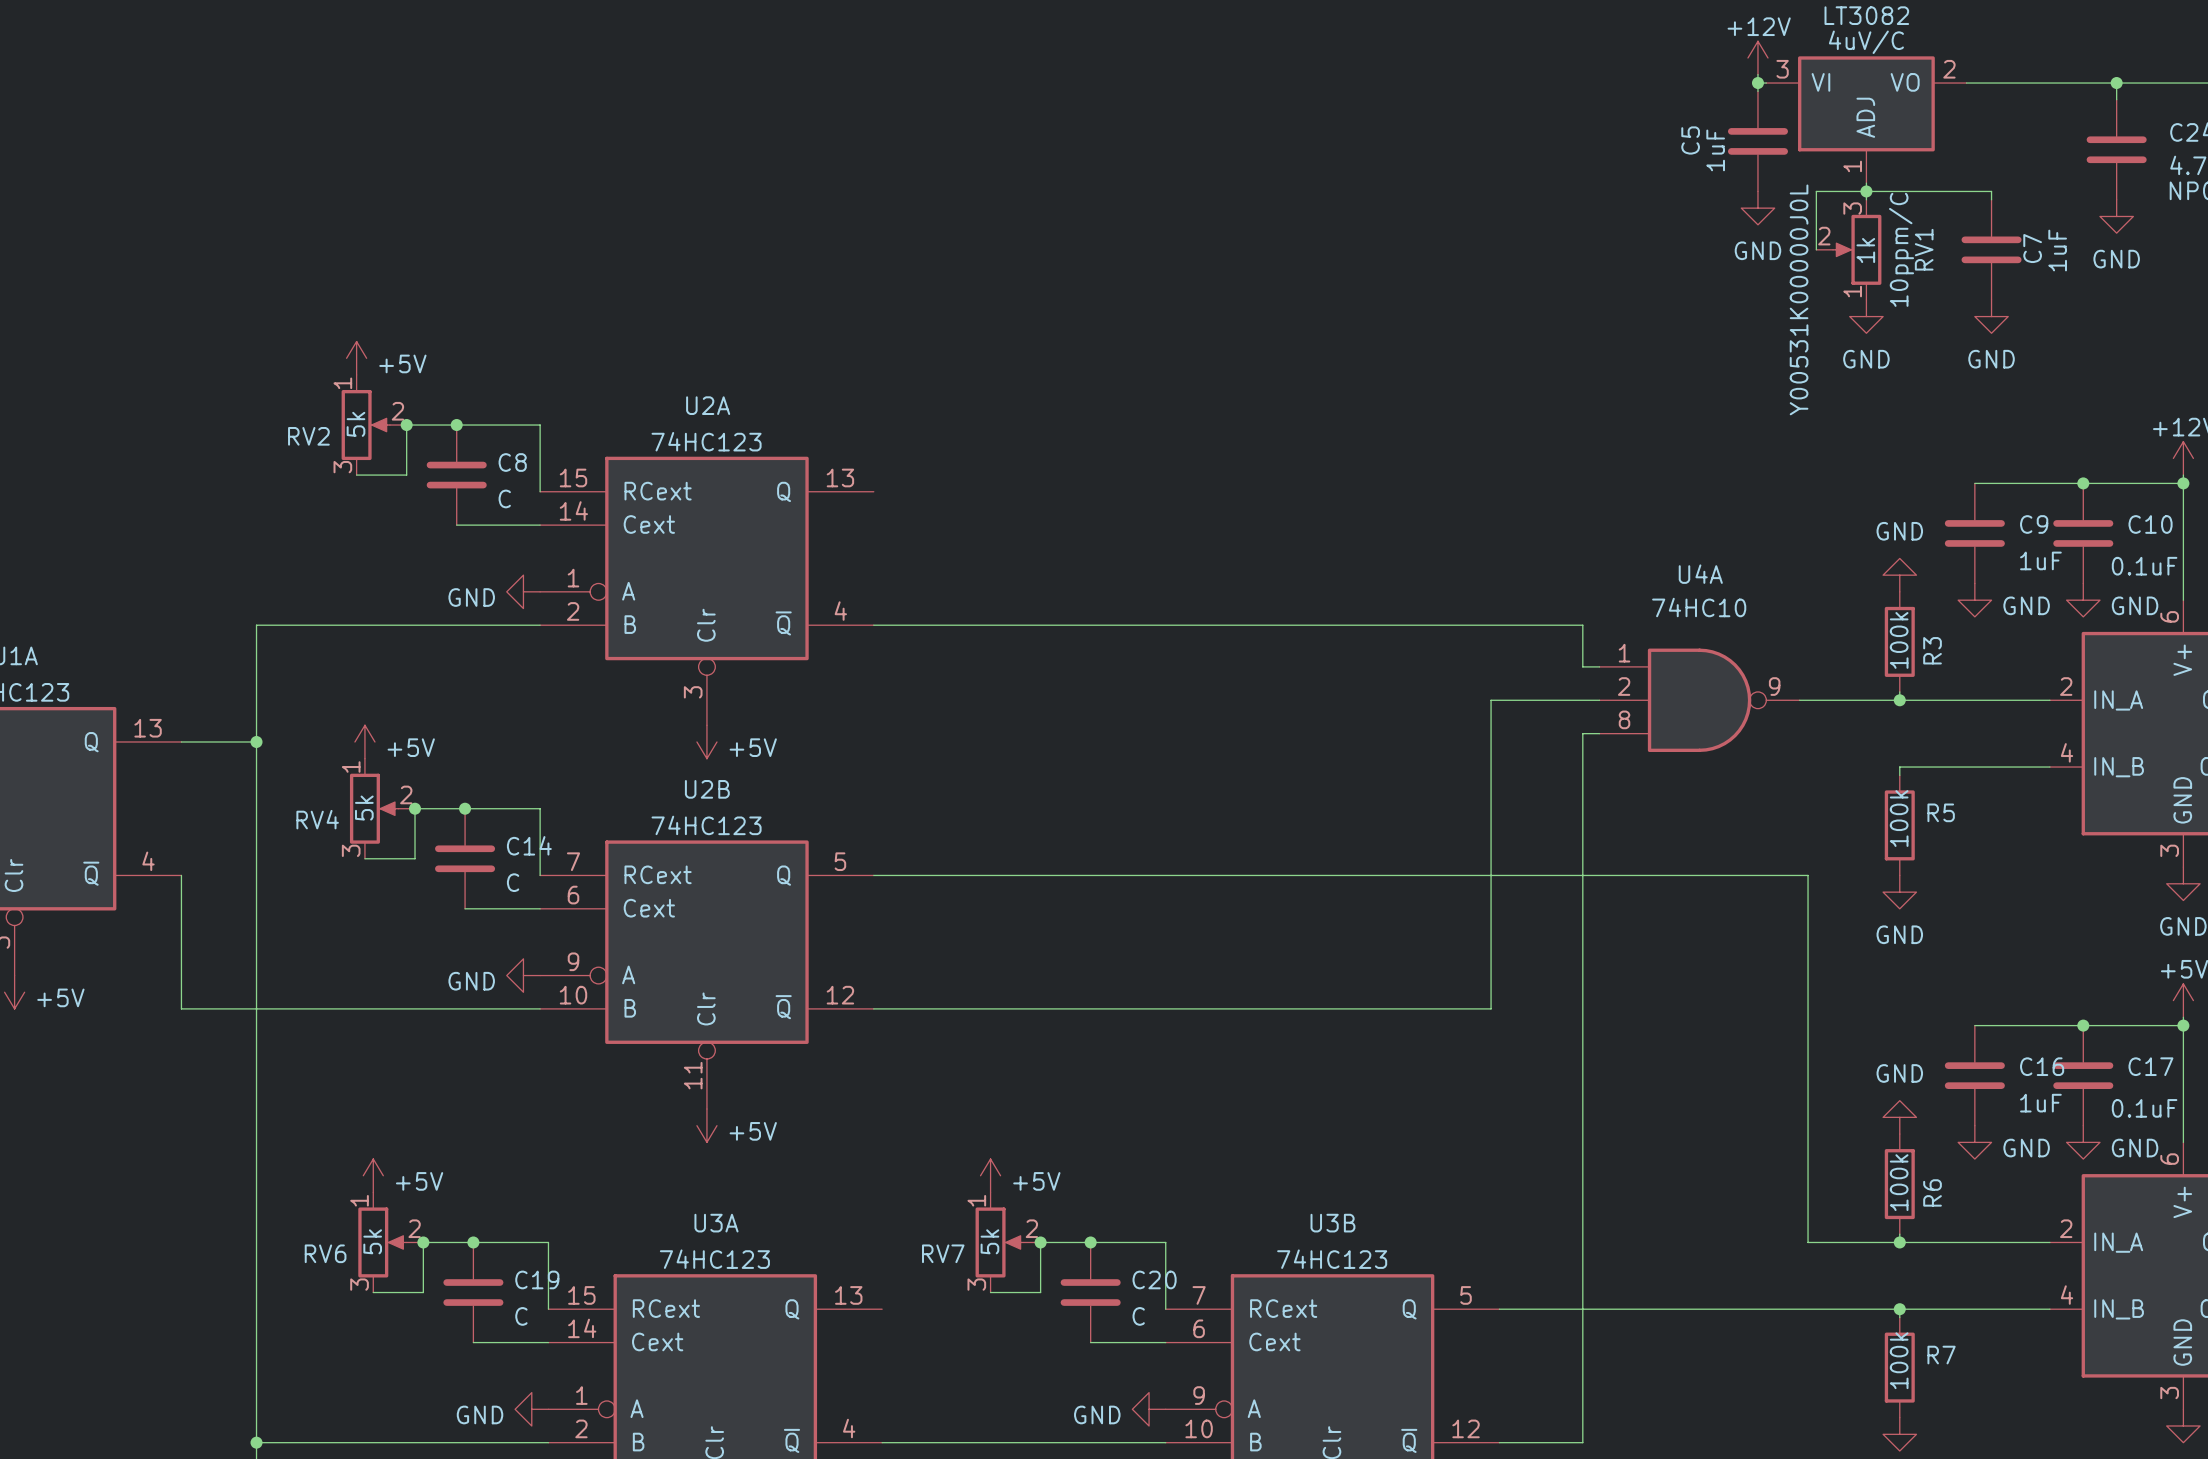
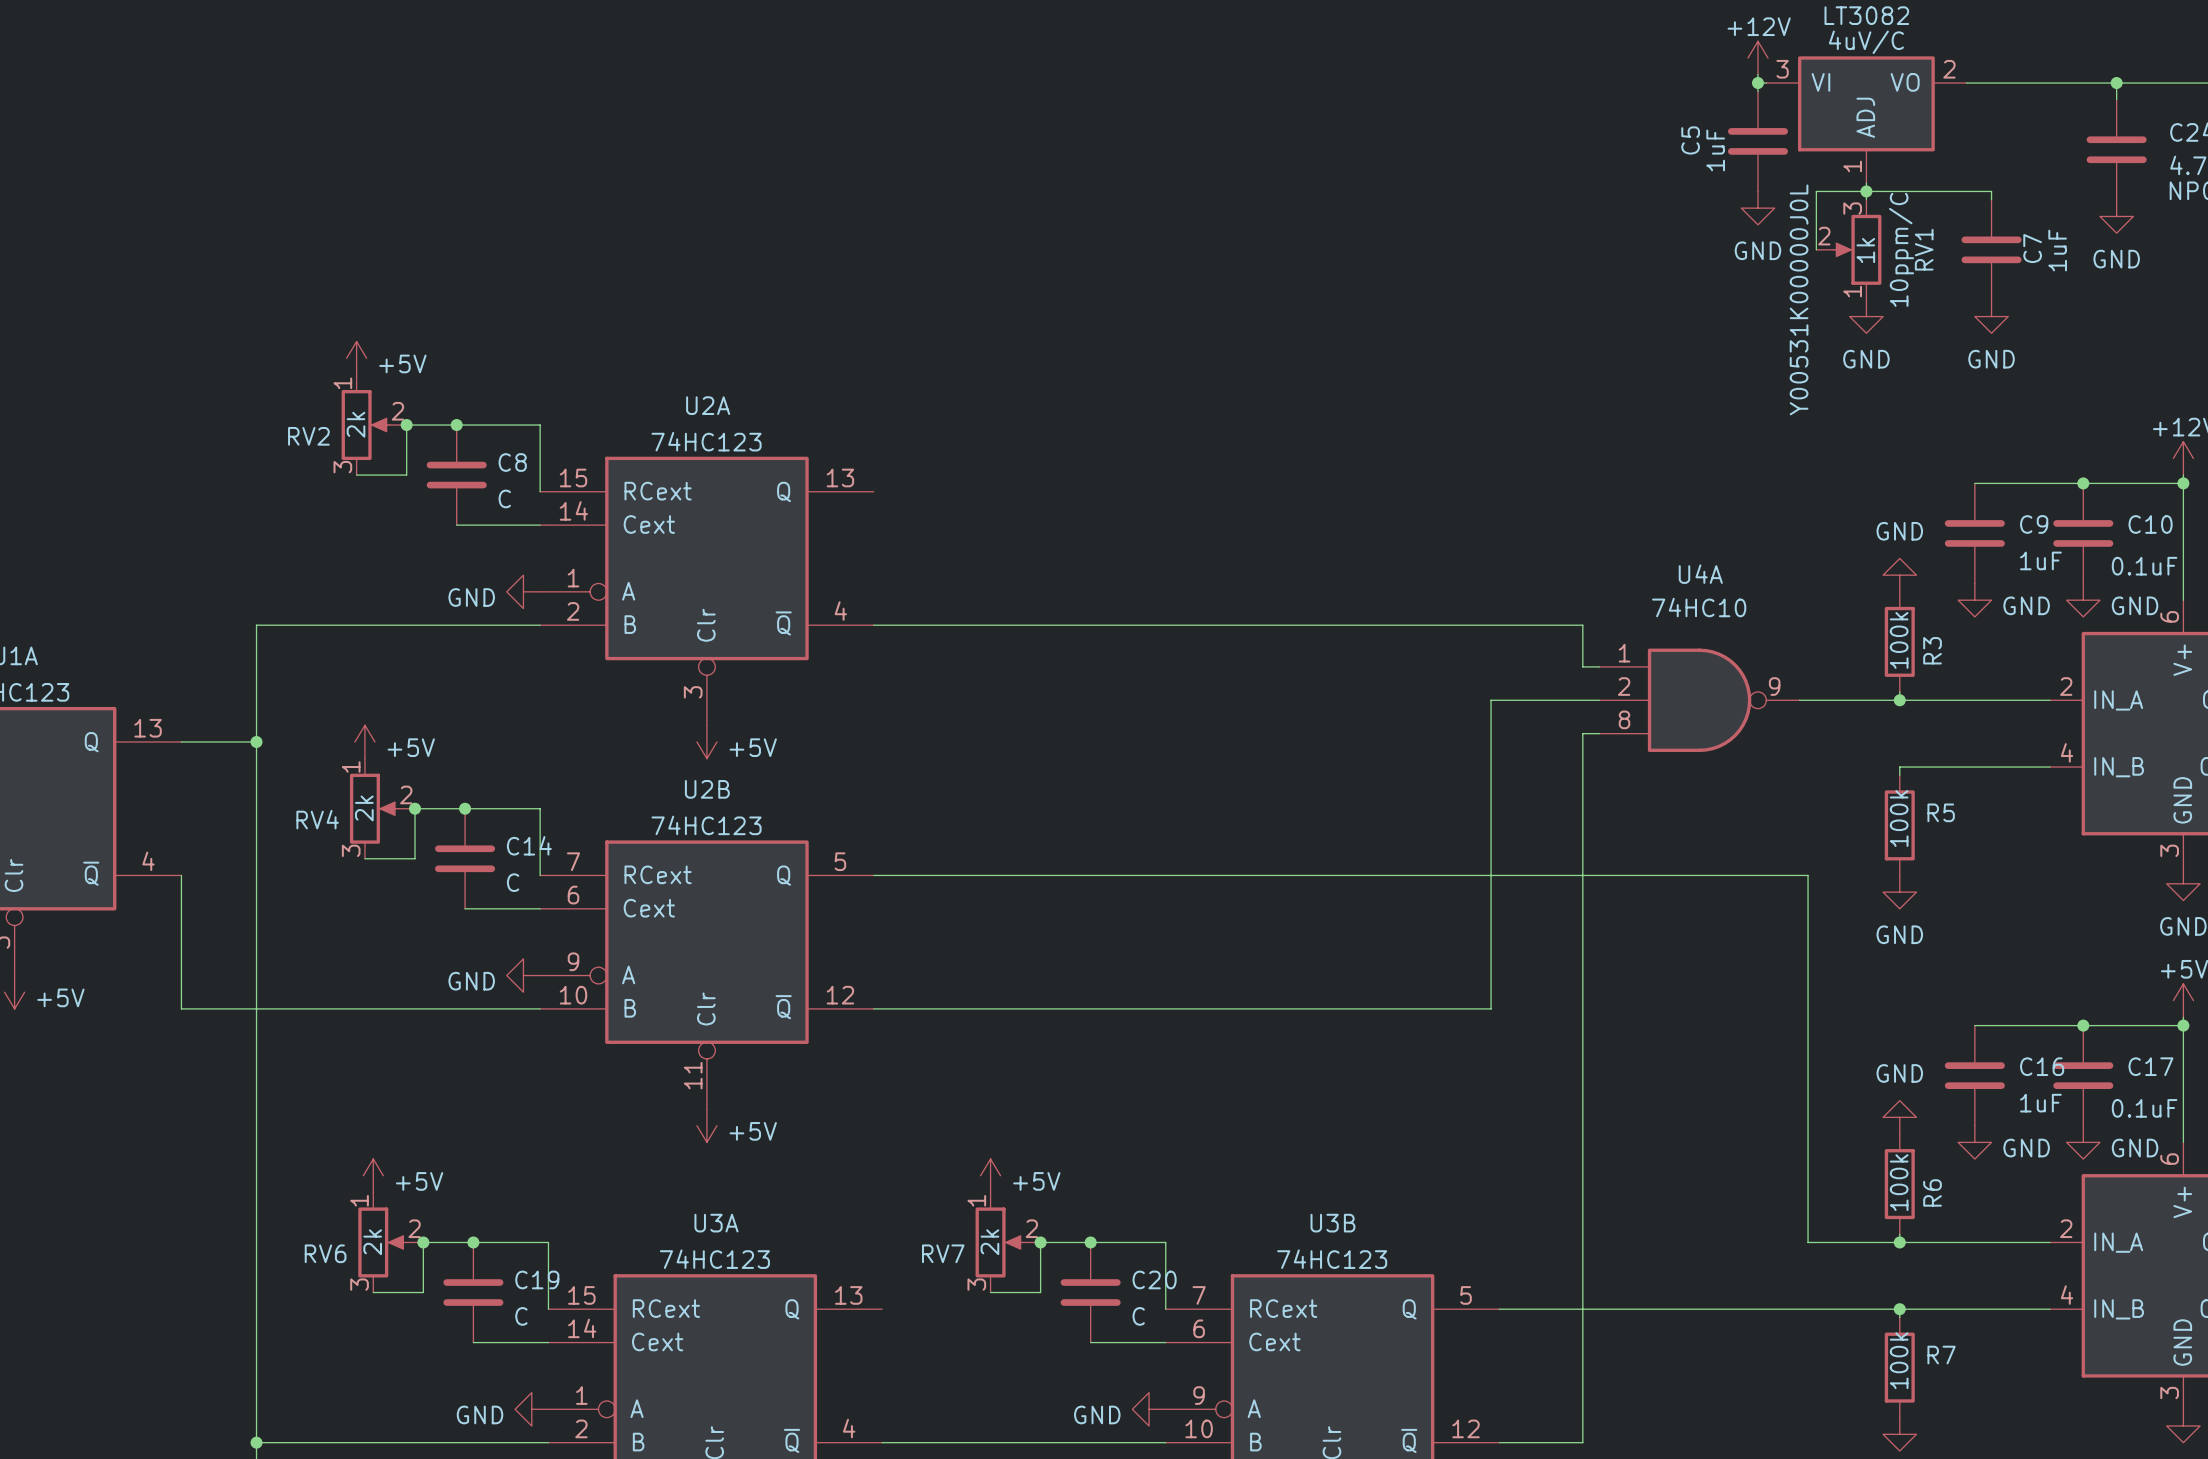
RV2 value: 5k (355, 424) -> 2k (355, 424)
RV4 value: 5k (364, 808) -> 2k (364, 808)
RV6 value: 5k (372, 1241) -> 2k (372, 1242)
RV7 value: 5k (989, 1241) -> 2k (989, 1242)

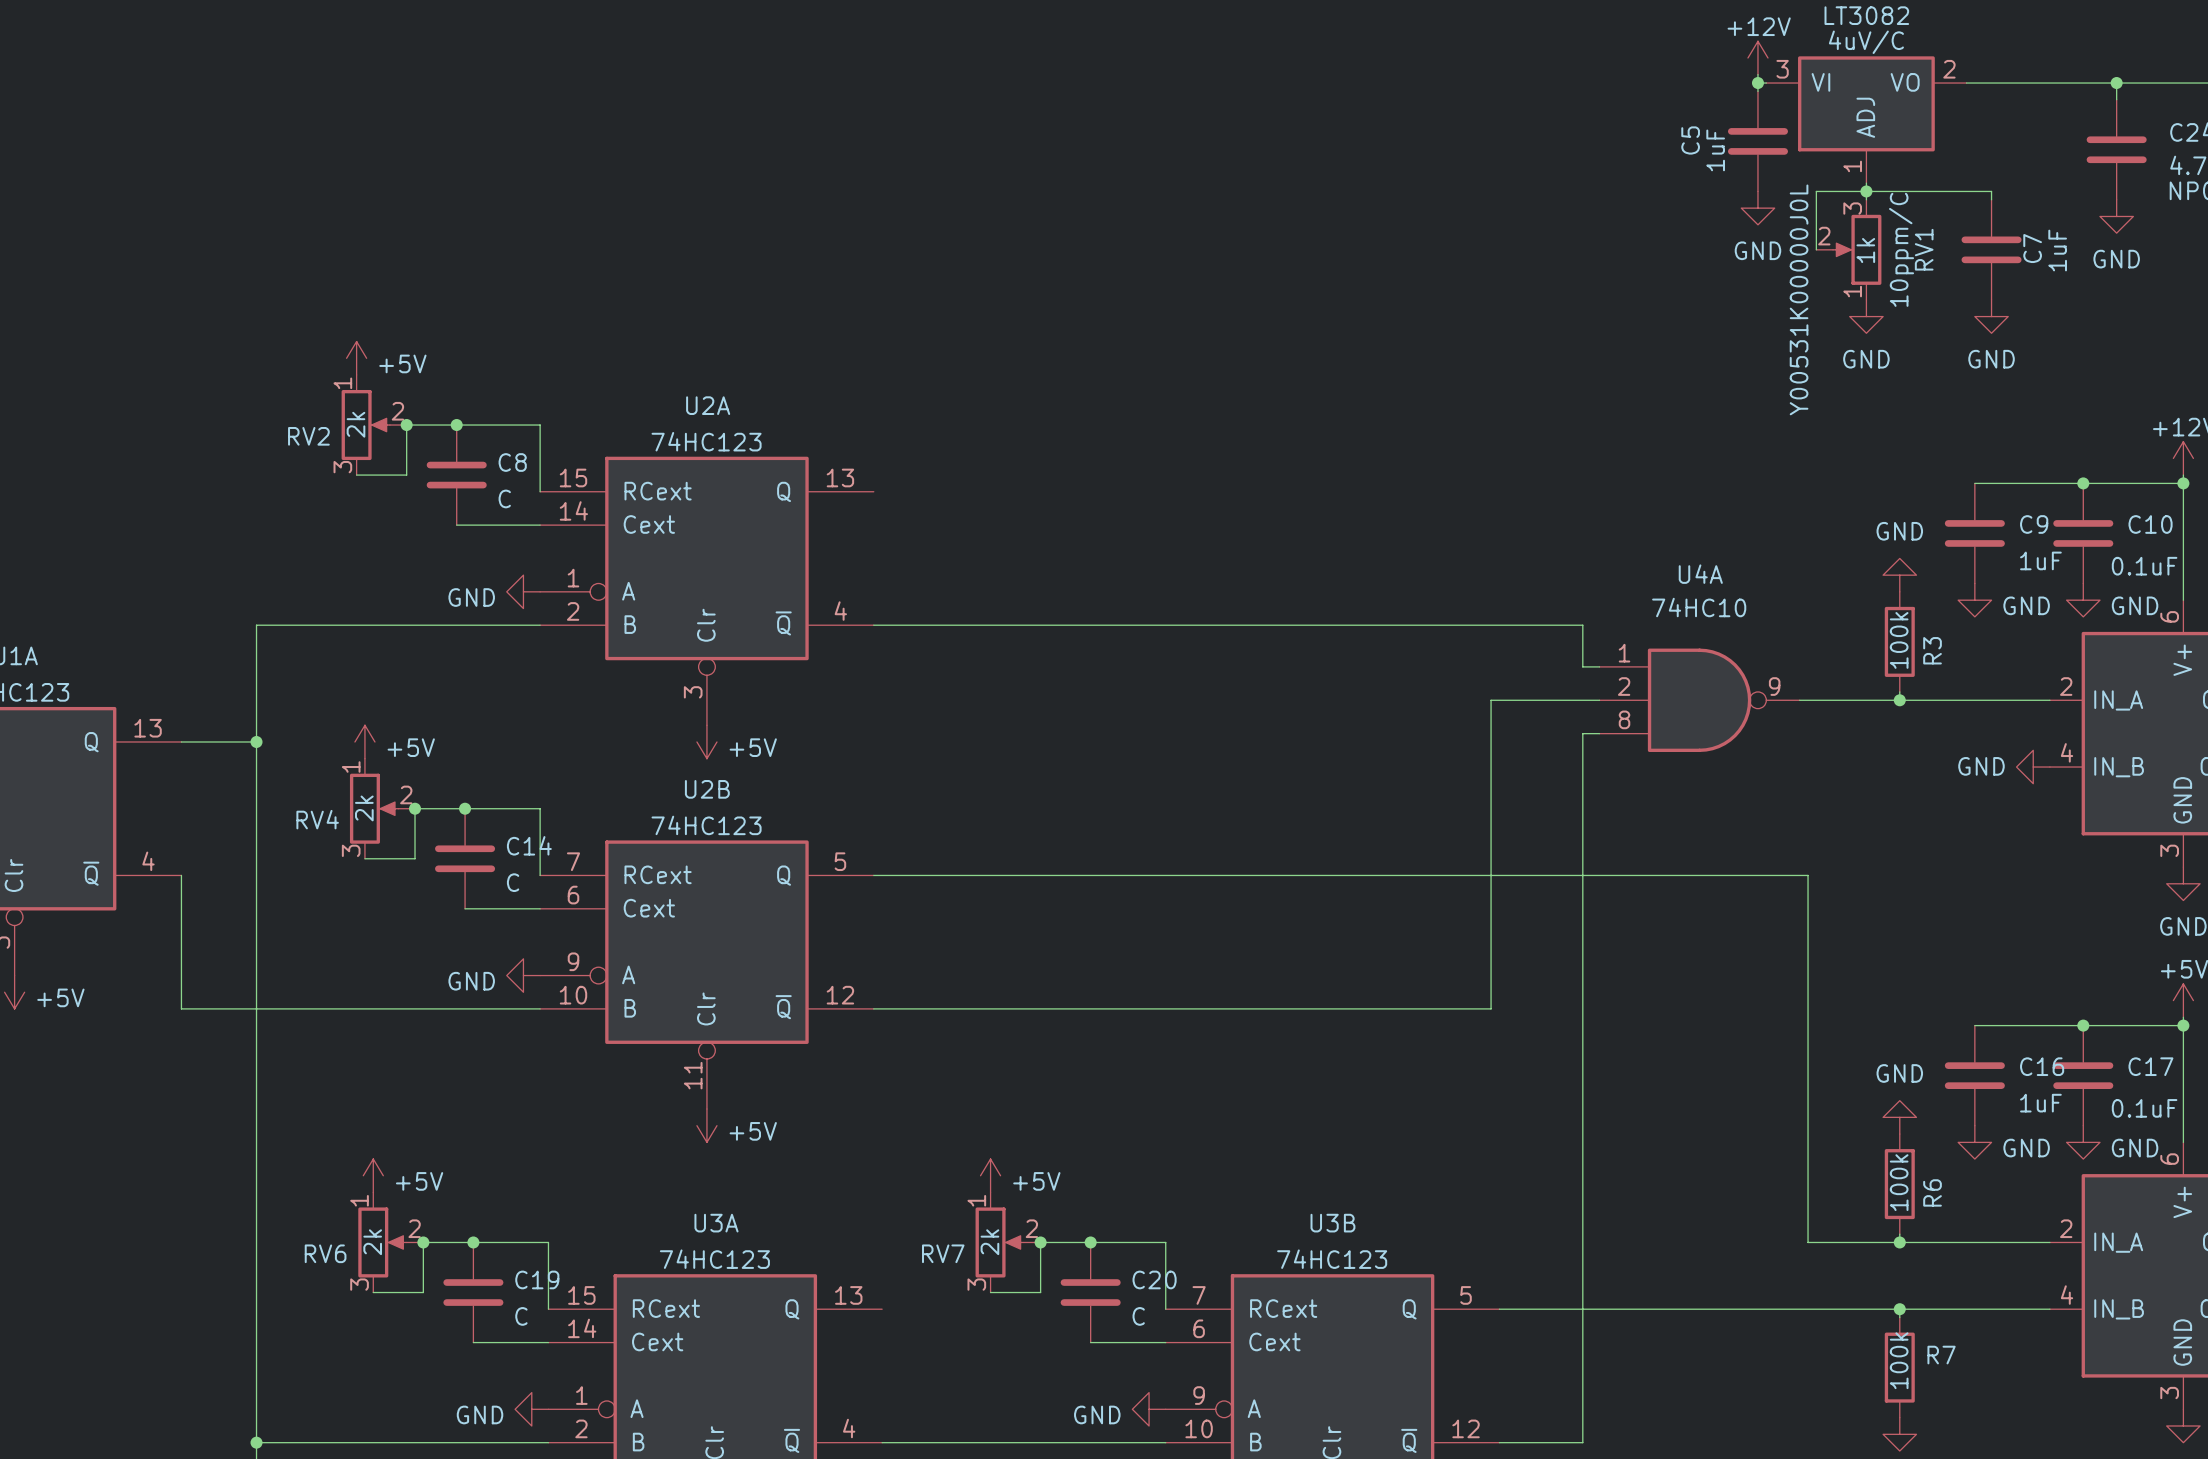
wire: (2049, 767) (1899, 767) (1899, 775) -> none
R5: 100k (1899, 825) -> none
power symbol rotation: 0° (1899, 892) -> 90° clockwise (2033, 767)
power symbol position: GND (1899, 892) -> GND (2033, 767)

